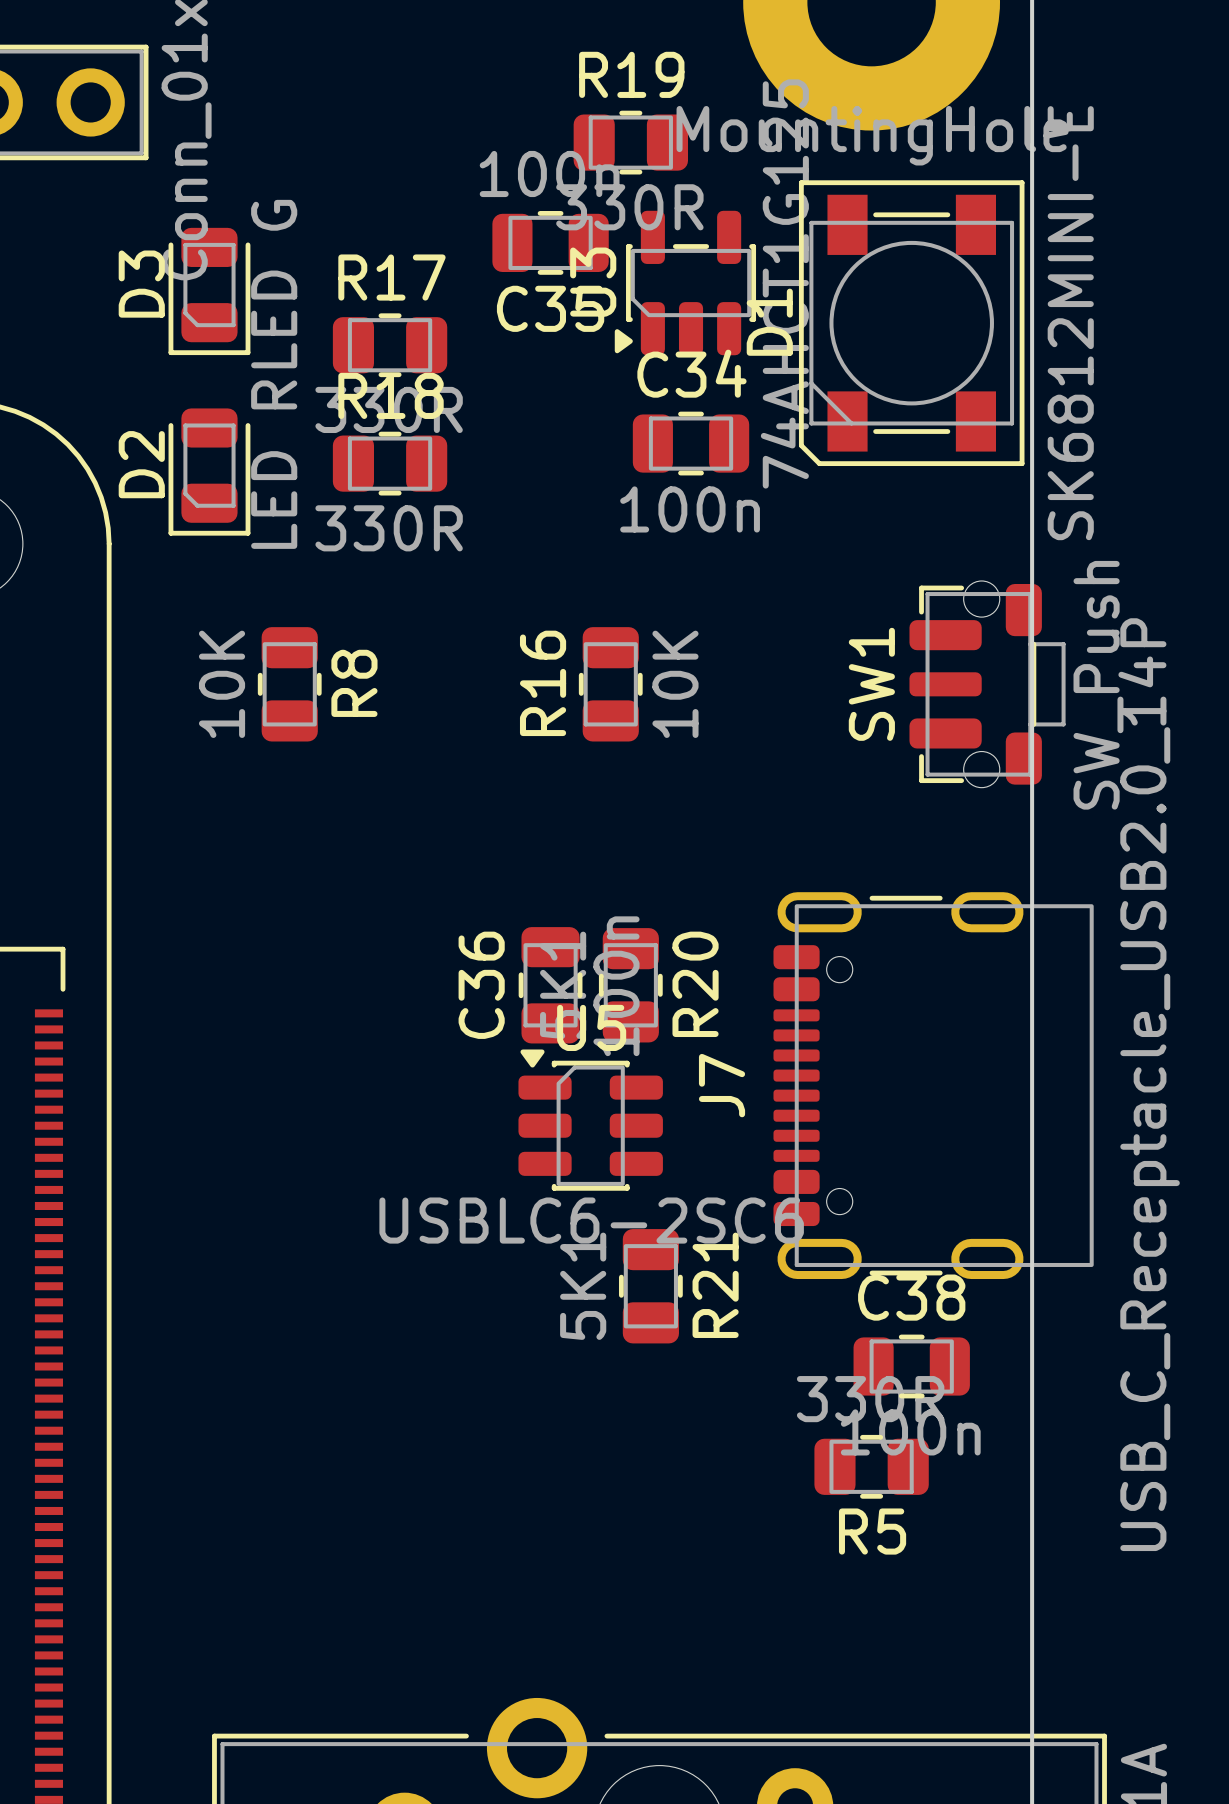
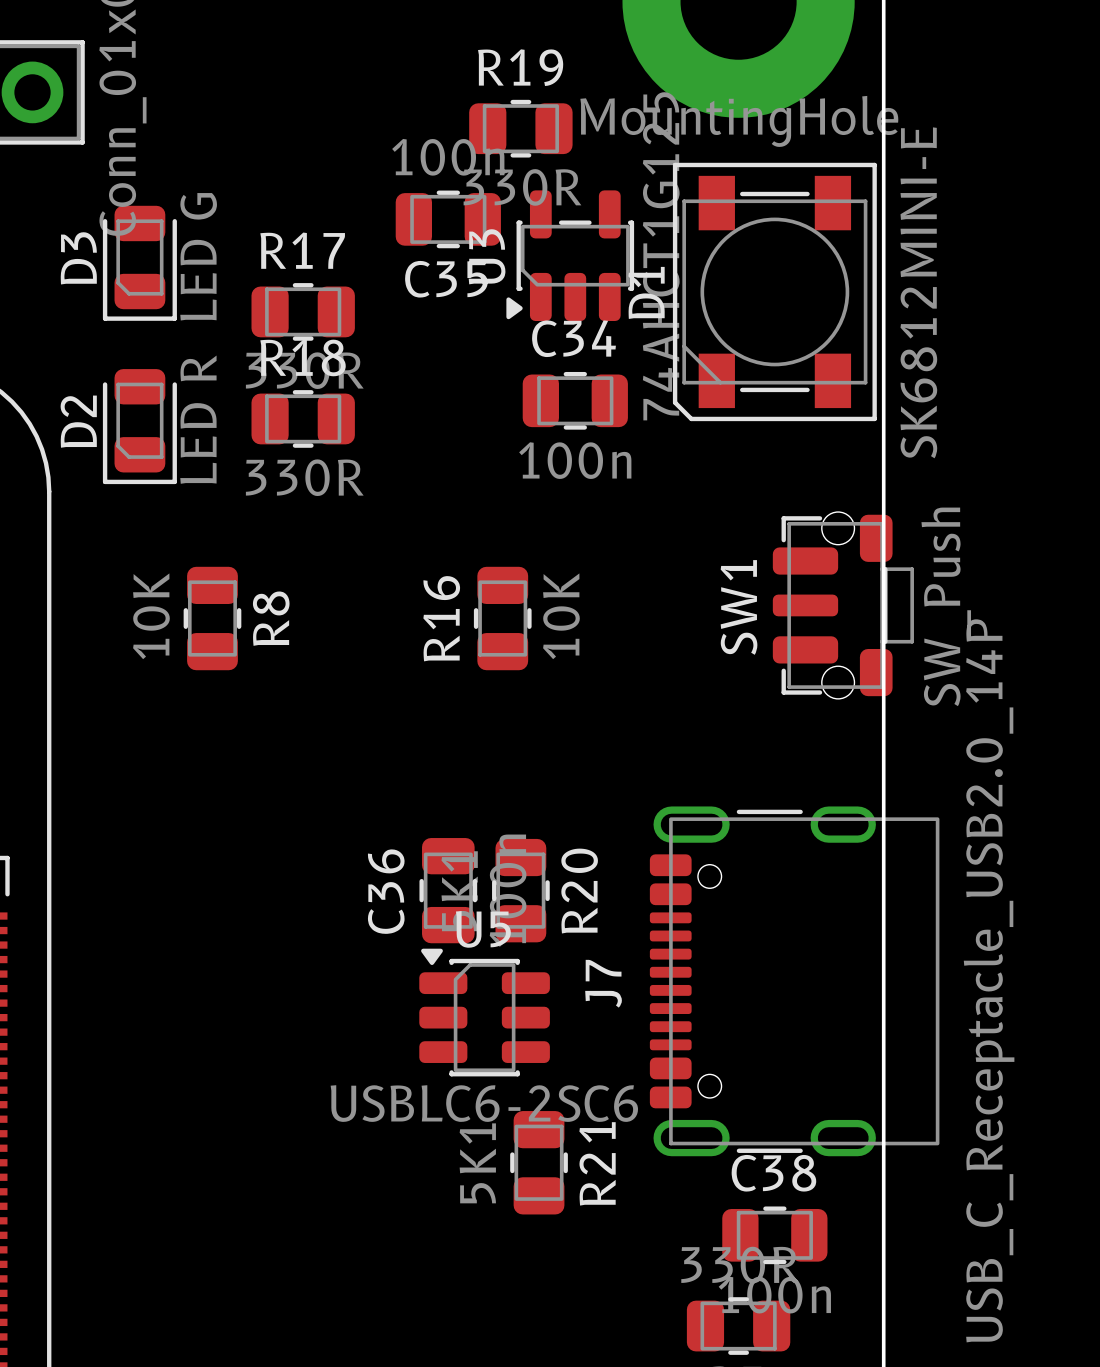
SW1 position: (987, 684) -> (843, 605)

